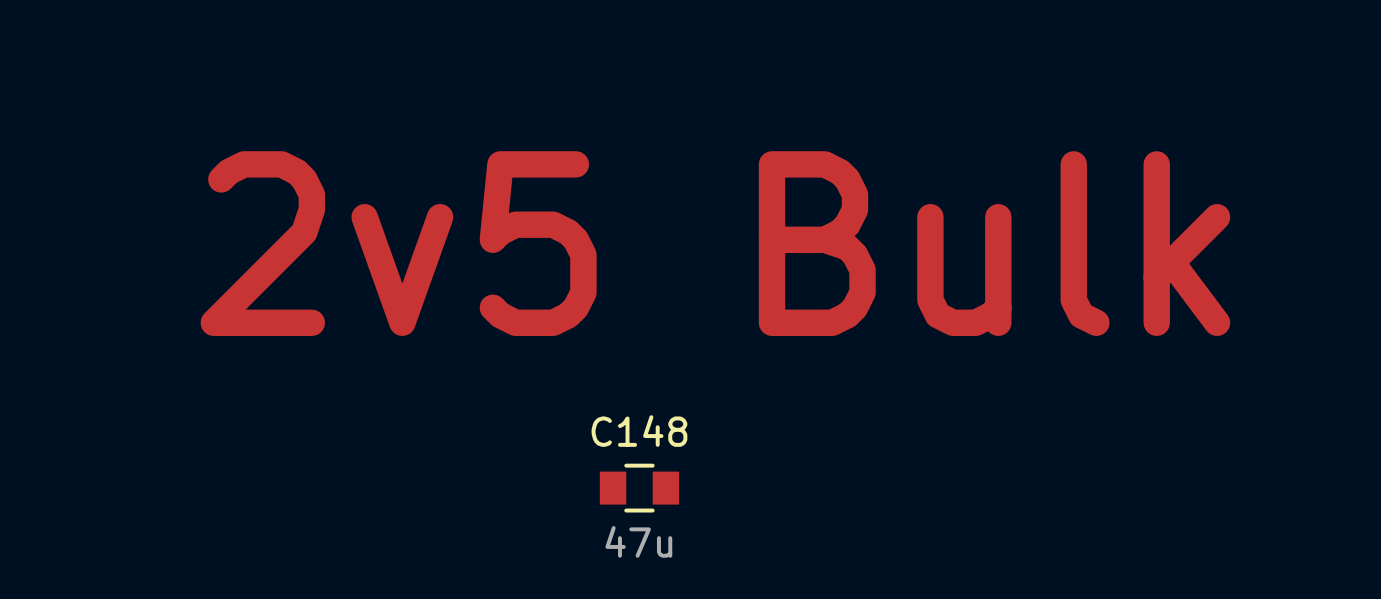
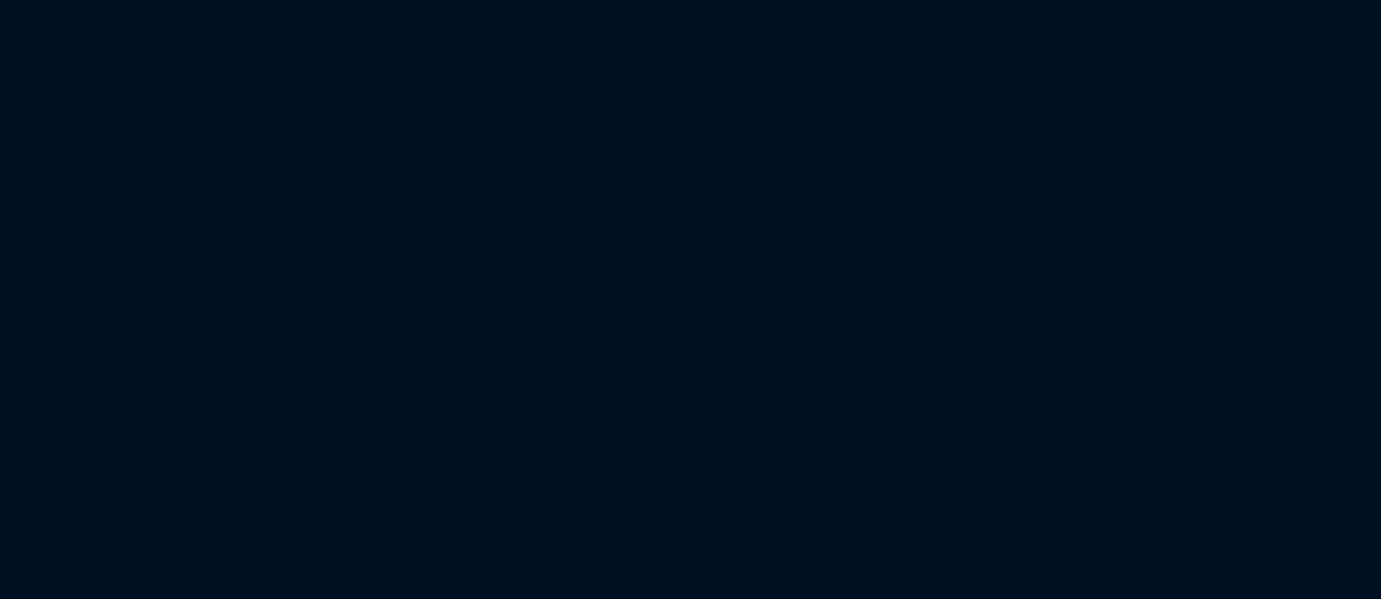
text: 2v5 Bulk (715, 243) -> none
C148: 47u (639, 488) -> none

